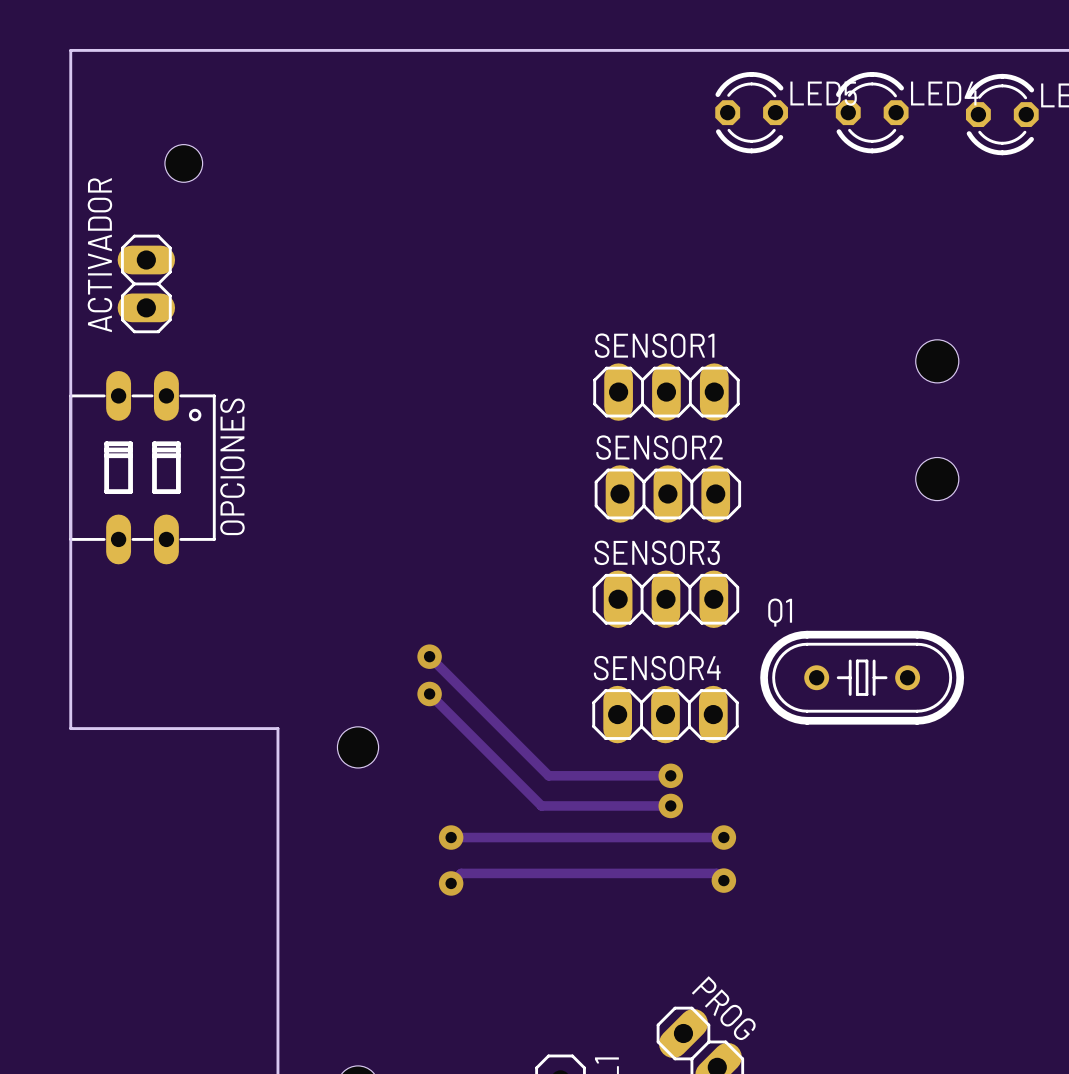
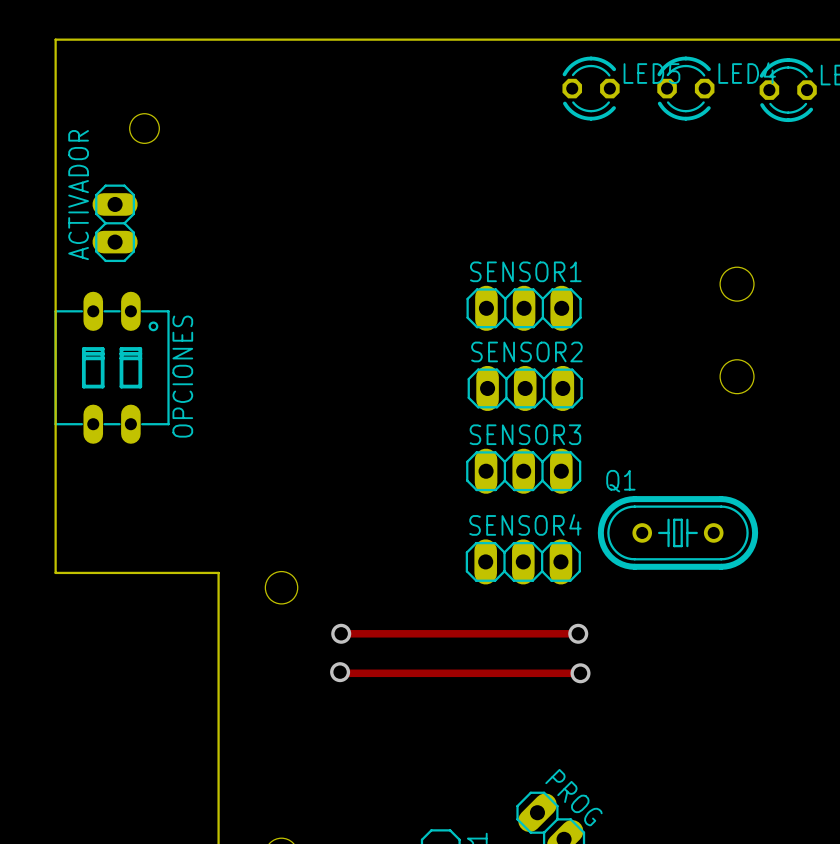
track: (429, 656) (548, 775) (670, 775) -> none
via: (429, 656) -> none
track: (429, 693) (541, 805) -> (341, 633) (425, 633)
via: (429, 693) -> none
via: (670, 775) -> none
via: none -> (341, 633)
track: none -> (527, 633) (578, 633)
via: (670, 805) -> none
via: none -> (578, 633)
track: (451, 837) (723, 837) -> none
via: (451, 837) -> none
via: (723, 837) -> none
track: none -> (340, 672) (580, 673)
via: none -> (340, 672)
via: none -> (580, 673)
track: (723, 880) (716, 873) (461, 873) (451, 883) -> none
via: (723, 880) -> none
via: (451, 883) -> none

